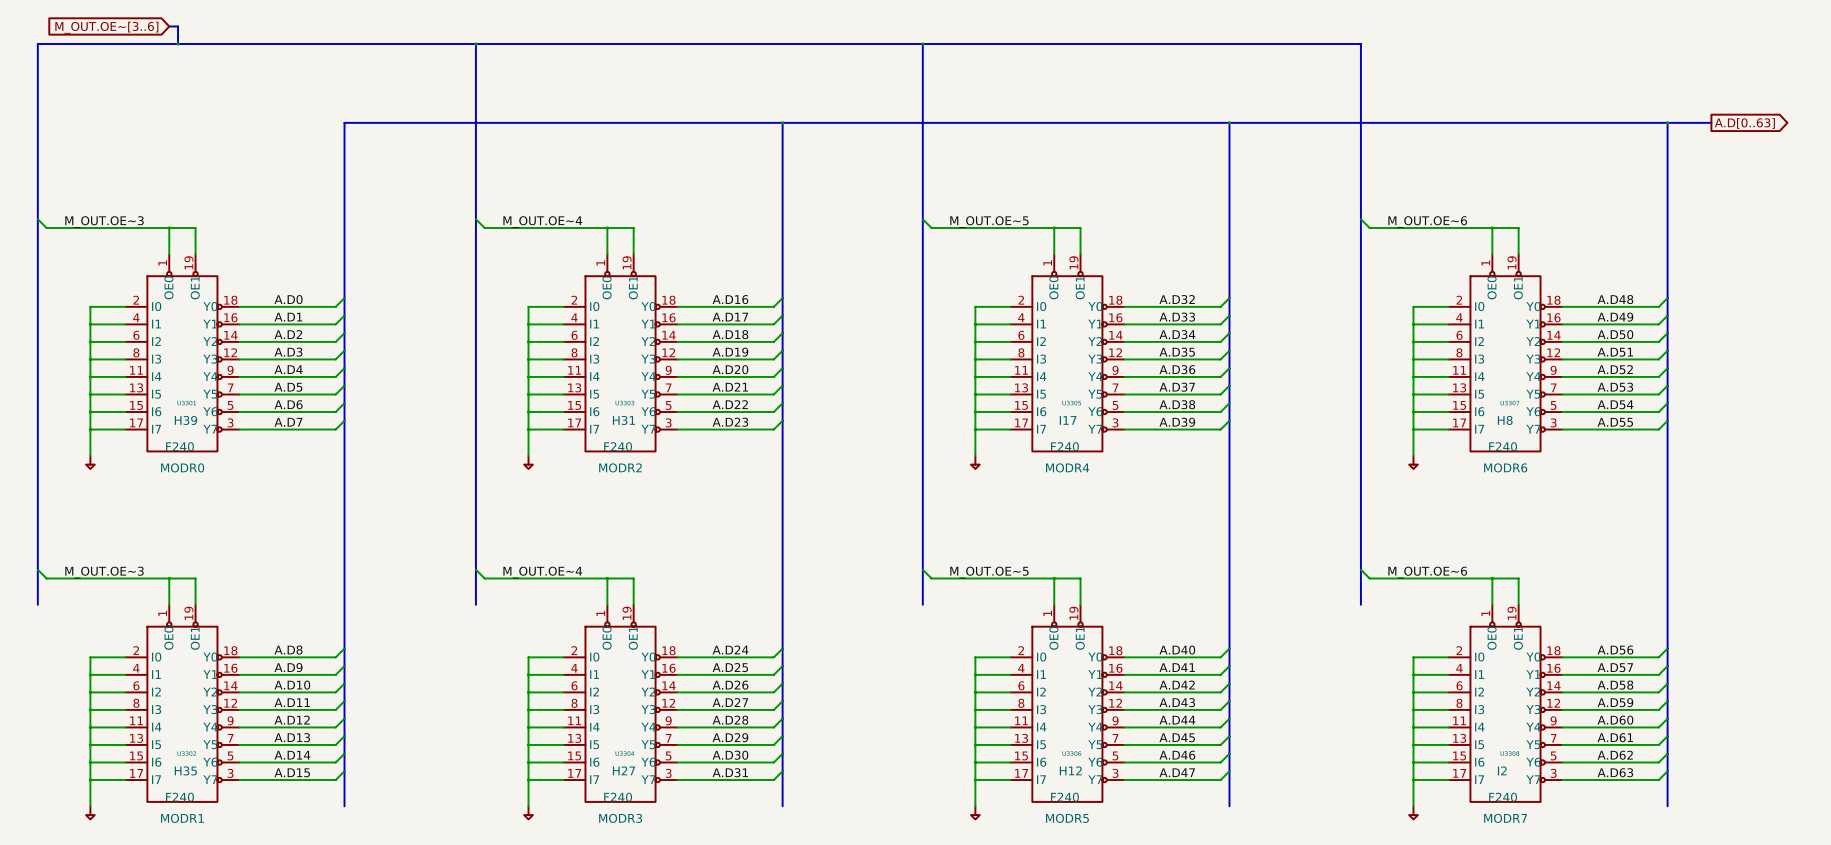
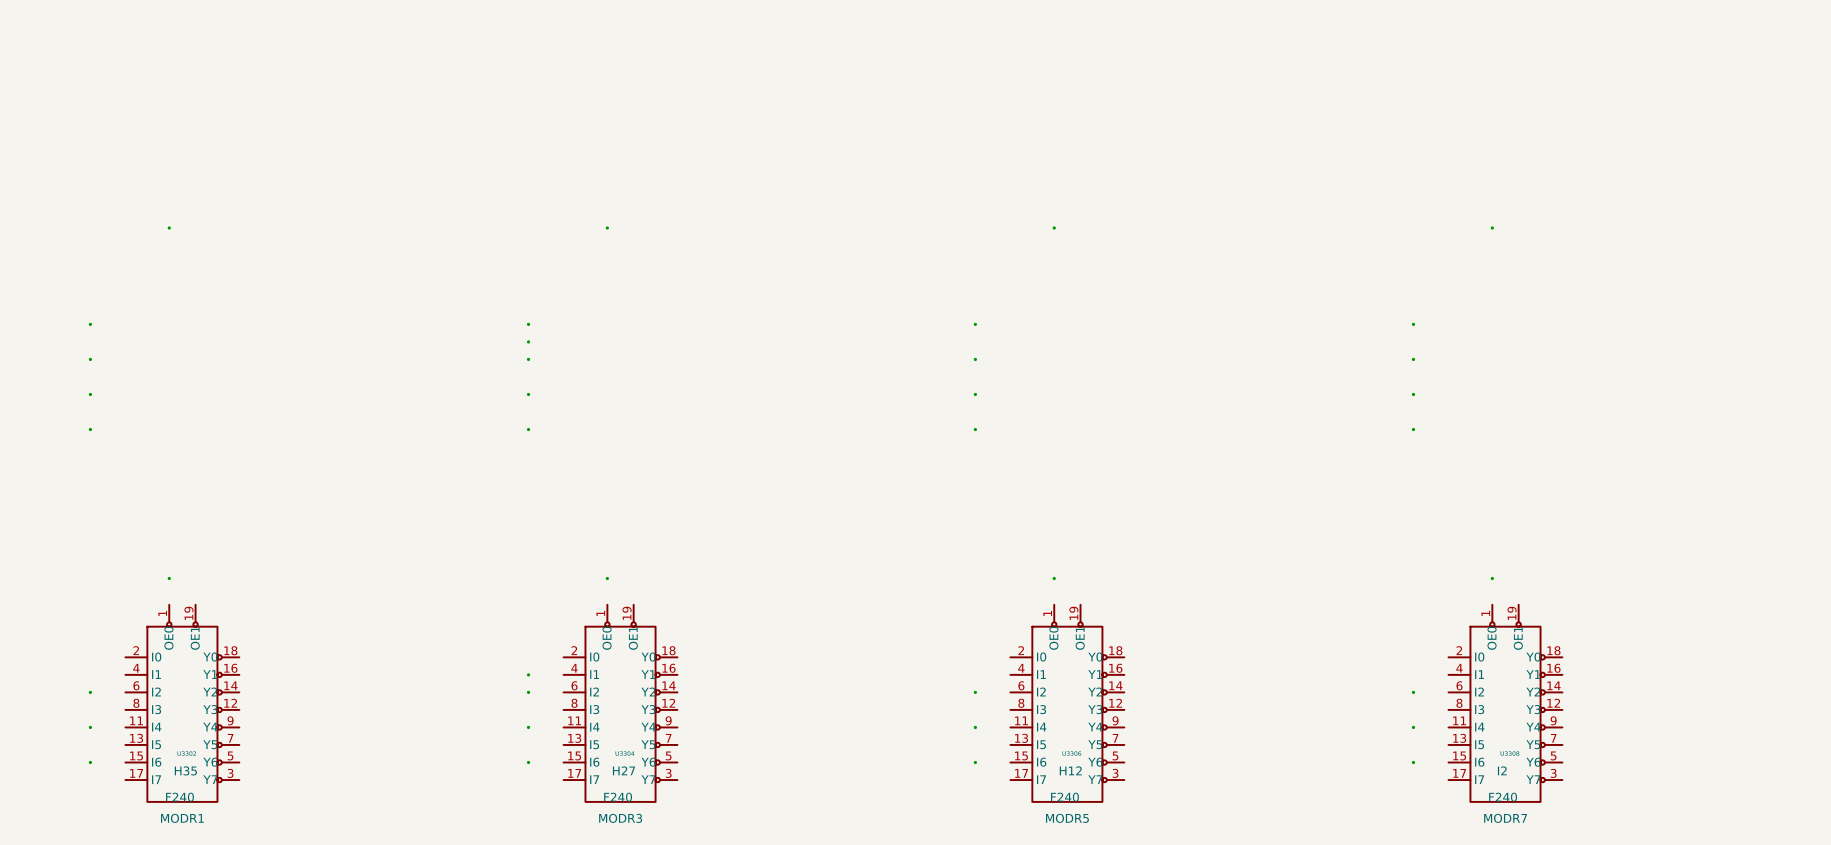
bus: (169, 26) (178, 26) (178, 44) -> none
global label: M_OUT.OE~[3..6] (106, 27) -> none
junction: (178, 44) -> none
bus: (475, 44) (475, 604) -> none
junction: (475, 44) -> none
bus: (922, 44) (922, 604) -> none
junction: (922, 44) -> none
bus: (782, 122) (782, 806) -> none
junction: (782, 122) -> none
bus: (1229, 122) (1229, 806) -> none
junction: (1229, 122) -> none
bus: (1667, 122) (1667, 806) -> none
junction: (1667, 122) -> none
bus: (1711, 122) (344, 122) (344, 806) -> none
global label: A.D[0..63] (1744, 123) -> none
wire: (37, 219) (46, 228) (195, 228) (195, 254) -> none
wire: (475, 219) (484, 228) (633, 228) (633, 254) -> none
wire: (922, 219) (931, 228) (1080, 228) (1080, 254) -> none
wire: (1360, 219) (1369, 228) (1518, 228) (1518, 254) -> none
label: M_OUT.OE~3 (104, 222) -> none
label: M_OUT.OE~4 (542, 222) -> none
label: M_OUT.OE~5 (989, 222) -> none
label: M_OUT.OE~6 (1427, 222) -> none
wire: (169, 228) (169, 254) -> none
wire: (607, 228) (607, 254) -> none
wire: (1054, 228) (1054, 254) -> none
wire: (1492, 228) (1492, 254) -> none
wire: (344, 298) (335, 306) (239, 306) -> none
wire: (782, 298) (773, 306) (677, 306) -> none
wire: (1229, 298) (1220, 306) (1124, 306) -> none
wire: (1667, 298) (1658, 306) (1562, 306) -> none
label: A.D0 (288, 299) -> none
label: A.D16 (730, 299) -> none
label: A.D32 (1177, 299) -> none
label: A.D48 (1615, 299) -> none
wire: (125, 306) (90, 306) (90, 455) -> none
wire: (563, 306) (528, 306) (528, 455) -> none
wire: (1010, 306) (975, 306) (975, 455) -> none
wire: (1448, 306) (1413, 306) (1413, 455) -> none
wire: (344, 315) (335, 324) (239, 324) -> none
wire: (782, 315) (773, 324) (677, 324) -> none
wire: (1229, 315) (1220, 324) (1124, 324) -> none
wire: (1667, 315) (1658, 324) (1562, 324) -> none
label: A.D1 (288, 317) -> none
label: A.D17 (730, 317) -> none
label: A.D33 (1177, 317) -> none
label: A.D49 (1615, 317) -> none
wire: (90, 324) (125, 324) -> none
wire: (528, 324) (563, 324) -> none
wire: (975, 324) (1010, 324) -> none
wire: (1413, 324) (1448, 324) -> none
wire: (344, 333) (335, 341) (239, 341) -> none
wire: (782, 333) (773, 341) (677, 341) -> none
wire: (1229, 333) (1220, 341) (1124, 341) -> none
wire: (1667, 333) (1658, 341) (1562, 341) -> none
label: A.D2 (288, 334) -> none
label: A.D18 (730, 334) -> none
label: A.D34 (1177, 334) -> none
label: A.D50 (1615, 334) -> none
wire: (90, 341) (125, 341) -> none
wire: (528, 341) (563, 341) -> none
wire: (975, 341) (1010, 341) -> none
wire: (1413, 341) (1448, 341) -> none
wire: (344, 350) (335, 359) (239, 359) -> none
wire: (782, 350) (773, 359) (677, 359) -> none
wire: (1229, 350) (1220, 359) (1124, 359) -> none
wire: (1667, 350) (1658, 359) (1562, 359) -> none
part: F240 (182, 352) -> none
label: A.D3 (288, 352) -> none
part: F240 (620, 352) -> none
label: A.D19 (730, 352) -> none
part: F240 (1067, 352) -> none
label: A.D35 (1177, 352) -> none
part: F240 (1505, 352) -> none
label: A.D51 (1615, 352) -> none
wire: (90, 359) (125, 359) -> none
wire: (528, 359) (563, 359) -> none
wire: (975, 359) (1010, 359) -> none
wire: (1413, 359) (1448, 359) -> none
wire: (344, 368) (335, 376) (239, 376) -> none
wire: (782, 368) (773, 376) (677, 376) -> none
wire: (1229, 368) (1220, 376) (1124, 376) -> none
wire: (1667, 368) (1658, 376) (1562, 376) -> none
label: A.D4 (288, 369) -> none
label: A.D20 (730, 369) -> none
label: A.D36 (1177, 369) -> none
label: A.D52 (1615, 369) -> none
wire: (90, 376) (125, 376) -> none
wire: (528, 376) (563, 376) -> none
wire: (975, 376) (1010, 376) -> none
wire: (1413, 376) (1448, 376) -> none
wire: (344, 385) (335, 394) (239, 394) -> none
wire: (782, 385) (773, 394) (677, 394) -> none
wire: (1229, 385) (1220, 394) (1124, 394) -> none
wire: (1667, 385) (1658, 394) (1562, 394) -> none
label: A.D5 (288, 387) -> none
label: A.D21 (730, 387) -> none
label: A.D37 (1177, 387) -> none
label: A.D53 (1615, 387) -> none
wire: (90, 394) (125, 394) -> none
wire: (528, 394) (563, 394) -> none
wire: (975, 394) (1010, 394) -> none
wire: (1413, 394) (1448, 394) -> none
wire: (344, 403) (335, 412) (239, 412) -> none
wire: (782, 403) (773, 412) (677, 412) -> none
wire: (1229, 403) (1220, 412) (1124, 412) -> none
wire: (1667, 403) (1658, 412) (1562, 412) -> none
label: A.D6 (288, 404) -> none
label: A.D22 (730, 404) -> none
label: A.D38 (1177, 404) -> none
label: A.D54 (1615, 404) -> none
wire: (90, 412) (125, 412) -> none
wire: (528, 412) (563, 412) -> none
wire: (975, 412) (1010, 412) -> none
wire: (1413, 412) (1448, 412) -> none
wire: (344, 420) (335, 429) (239, 429) -> none
wire: (782, 420) (773, 429) (677, 429) -> none
wire: (1229, 420) (1220, 429) (1124, 429) -> none
wire: (1667, 420) (1658, 429) (1562, 429) -> none
label: A.D7 (288, 422) -> none
label: A.D23 (730, 422) -> none
label: A.D39 (1177, 422) -> none
label: A.D55 (1615, 422) -> none
wire: (90, 429) (125, 429) -> none
wire: (528, 429) (563, 429) -> none
wire: (975, 429) (1010, 429) -> none
wire: (1413, 429) (1448, 429) -> none
power symbol: (90, 462) -> none
power symbol: (528, 462) -> none
power symbol: (975, 462) -> none
power symbol: (1413, 462) -> none
wire: (37, 569) (46, 578) (195, 578) (195, 604) -> none
wire: (475, 569) (484, 578) (633, 578) (633, 604) -> none
wire: (922, 569) (931, 578) (1080, 578) (1080, 604) -> none
wire: (1360, 569) (1369, 578) (1518, 578) (1518, 604) -> none
label: M_OUT.OE~3 (104, 572) -> none
label: M_OUT.OE~4 (542, 572) -> none
label: M_OUT.OE~5 (989, 572) -> none
label: M_OUT.OE~6 (1427, 572) -> none
wire: (169, 578) (169, 604) -> none
wire: (607, 578) (607, 604) -> none
wire: (1054, 578) (1054, 604) -> none
wire: (1492, 578) (1492, 604) -> none
bus: (37, 604) (37, 44) (1360, 44) (1360, 604) -> none
wire: (344, 648) (335, 657) (239, 657) -> none
wire: (782, 648) (773, 657) (677, 657) -> none
wire: (1229, 648) (1220, 657) (1124, 657) -> none
wire: (1667, 648) (1658, 657) (1562, 657) -> none
label: A.D24 (730, 649) -> none
label: A.D8 (288, 650) -> none
label: A.D40 (1177, 650) -> none
label: A.D56 (1615, 650) -> none
wire: (125, 657) (90, 657) (90, 806) -> none
wire: (563, 657) (528, 657) (528, 806) -> none
wire: (1010, 657) (975, 657) (975, 806) -> none
wire: (1448, 657) (1413, 657) (1413, 806) -> none
wire: (344, 666) (335, 674) (239, 674) -> none
wire: (782, 666) (773, 674) (677, 674) -> none
wire: (1229, 666) (1220, 674) (1124, 674) -> none
wire: (1667, 666) (1658, 674) (1562, 674) -> none
label: A.D9 (288, 667) -> none
label: A.D25 (730, 667) -> none
label: A.D41 (1177, 667) -> none
label: A.D57 (1615, 667) -> none
wire: (90, 674) (125, 674) -> none
wire: (528, 674) (563, 674) -> none
wire: (975, 674) (1010, 674) -> none
wire: (1413, 674) (1448, 674) -> none
wire: (344, 683) (335, 692) (239, 692) -> none
wire: (782, 683) (773, 692) (677, 692) -> none
wire: (1229, 683) (1220, 692) (1124, 692) -> none
wire: (1667, 683) (1658, 692) (1562, 692) -> none
label: A.D10 (292, 685) -> none
label: A.D26 (730, 685) -> none
label: A.D42 (1177, 685) -> none
label: A.D58 (1615, 685) -> none
wire: (90, 692) (125, 692) -> none
wire: (528, 692) (563, 692) -> none
wire: (975, 692) (1010, 692) -> none
wire: (1413, 692) (1448, 692) -> none
wire: (344, 701) (335, 709) (239, 709) -> none
wire: (782, 701) (773, 709) (677, 709) -> none
wire: (1229, 701) (1220, 709) (1124, 709) -> none
wire: (1667, 701) (1658, 709) (1562, 709) -> none
label: A.D11 (292, 702) -> none
label: A.D27 (730, 702) -> none
label: A.D43 (1177, 702) -> none
label: A.D59 (1615, 702) -> none
wire: (90, 709) (125, 709) -> none
wire: (528, 709) (563, 709) -> none
wire: (975, 709) (1010, 709) -> none
wire: (1413, 709) (1448, 709) -> none
wire: (344, 718) (335, 727) (239, 727) -> none
wire: (782, 718) (773, 727) (677, 727) -> none
wire: (1229, 718) (1220, 727) (1124, 727) -> none
wire: (1667, 718) (1658, 727) (1562, 727) -> none
label: A.D12 (292, 720) -> none
label: A.D28 (730, 720) -> none
label: A.D44 (1177, 720) -> none
label: A.D60 (1615, 720) -> none
wire: (90, 727) (125, 727) -> none
wire: (528, 727) (563, 727) -> none
wire: (975, 727) (1010, 727) -> none
wire: (1413, 727) (1448, 727) -> none
wire: (344, 736) (335, 744) (239, 744) -> none
wire: (782, 736) (773, 744) (677, 744) -> none
wire: (1229, 736) (1220, 744) (1124, 744) -> none
wire: (1667, 736) (1658, 744) (1562, 744) -> none
label: A.D13 (292, 737) -> none
label: A.D29 (730, 737) -> none
label: A.D45 (1177, 737) -> none
label: A.D61 (1615, 737) -> none
wire: (90, 744) (125, 744) -> none
wire: (528, 744) (563, 744) -> none
wire: (975, 744) (1010, 744) -> none
wire: (1413, 744) (1448, 744) -> none
wire: (344, 753) (335, 762) (239, 762) -> none
wire: (782, 753) (773, 762) (677, 762) -> none
wire: (1229, 753) (1220, 762) (1124, 762) -> none
wire: (1667, 753) (1658, 762) (1562, 762) -> none
label: A.D14 (292, 755) -> none
label: A.D30 (730, 755) -> none
label: A.D46 (1177, 755) -> none
label: A.D62 (1615, 755) -> none
wire: (90, 762) (125, 762) -> none
wire: (528, 762) (563, 762) -> none
wire: (975, 762) (1010, 762) -> none
wire: (1413, 762) (1448, 762) -> none
wire: (344, 771) (335, 780) (239, 780) -> none
wire: (782, 771) (773, 780) (677, 780) -> none
wire: (1229, 771) (1220, 780) (1124, 780) -> none
wire: (1667, 771) (1658, 780) (1562, 780) -> none
label: A.D15 (292, 772) -> none
label: A.D31 (730, 772) -> none
label: A.D47 (1177, 772) -> none
label: A.D63 (1615, 772) -> none
wire: (90, 780) (125, 780) -> none
wire: (528, 780) (563, 780) -> none
wire: (975, 780) (1010, 780) -> none
wire: (1413, 780) (1448, 780) -> none
power symbol: (90, 813) -> none
power symbol: (528, 813) -> none
power symbol: (975, 813) -> none
power symbol: (1413, 813) -> none

